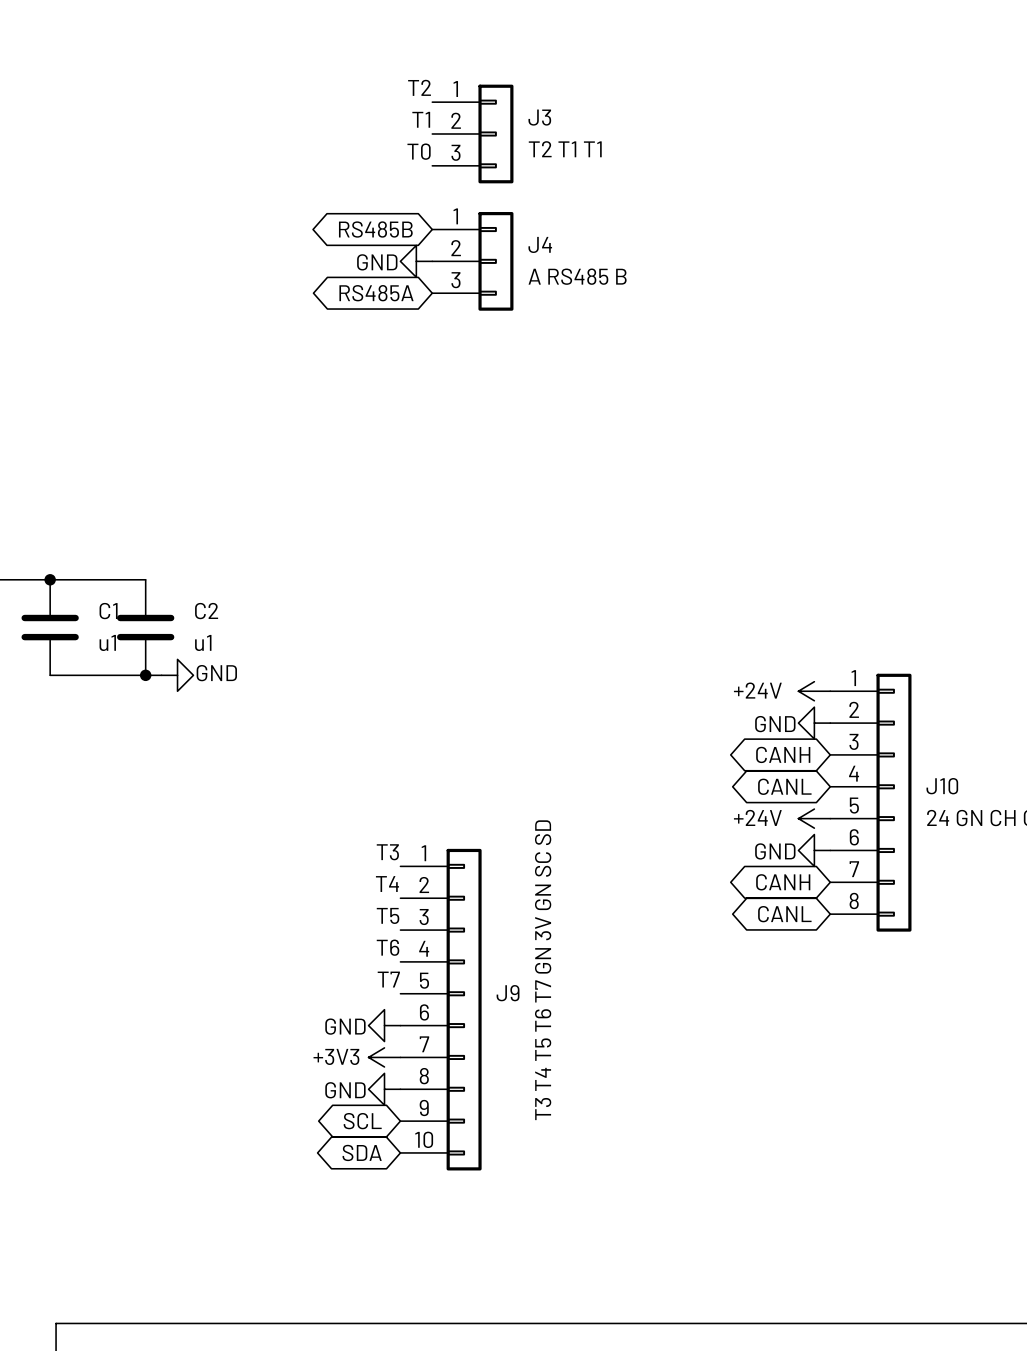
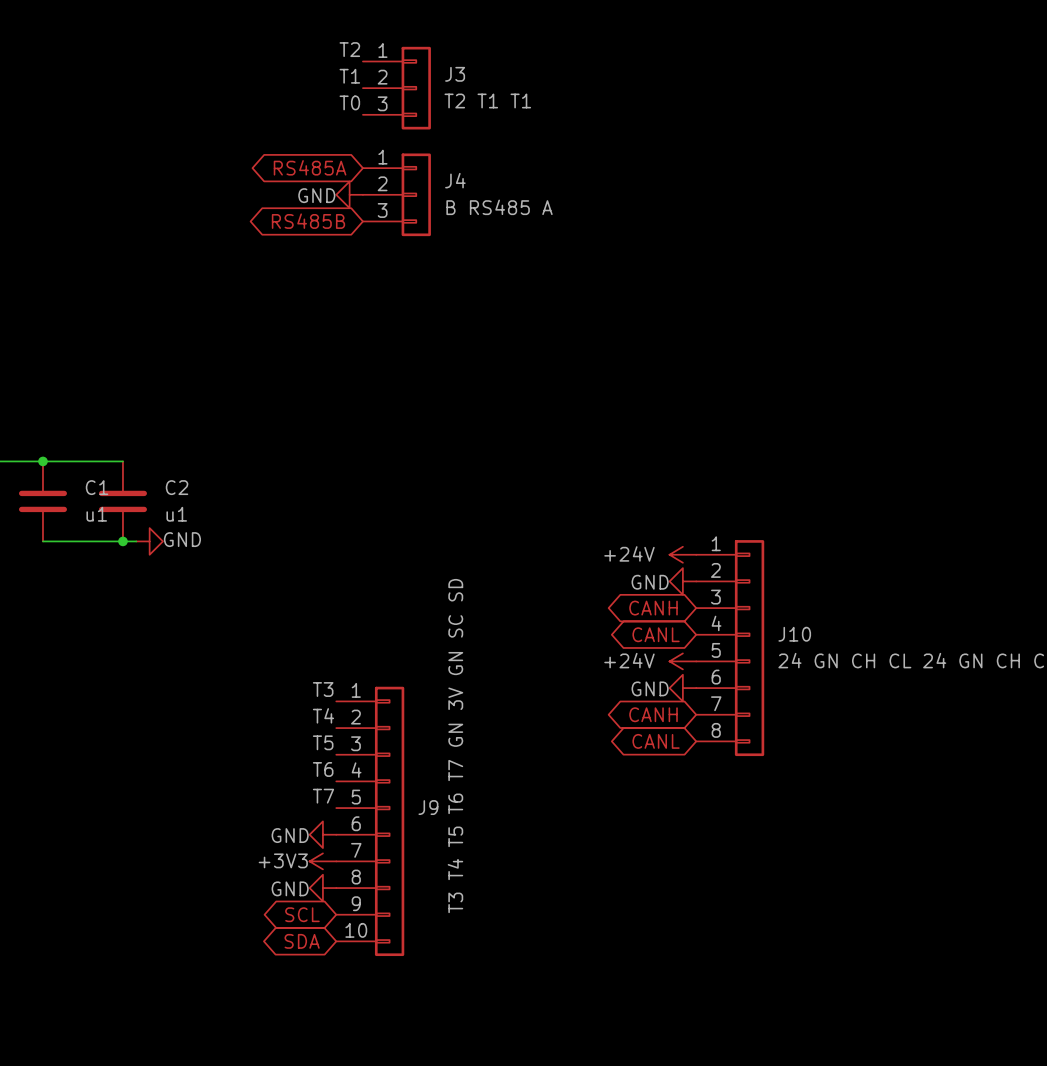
global label: RS485B (375, 229) -> RS485A (310, 167)
J4 value: A RS485 B (577, 276) -> B RS485 A (499, 207)
global label: RS485A (376, 293) -> RS485B (308, 221)

